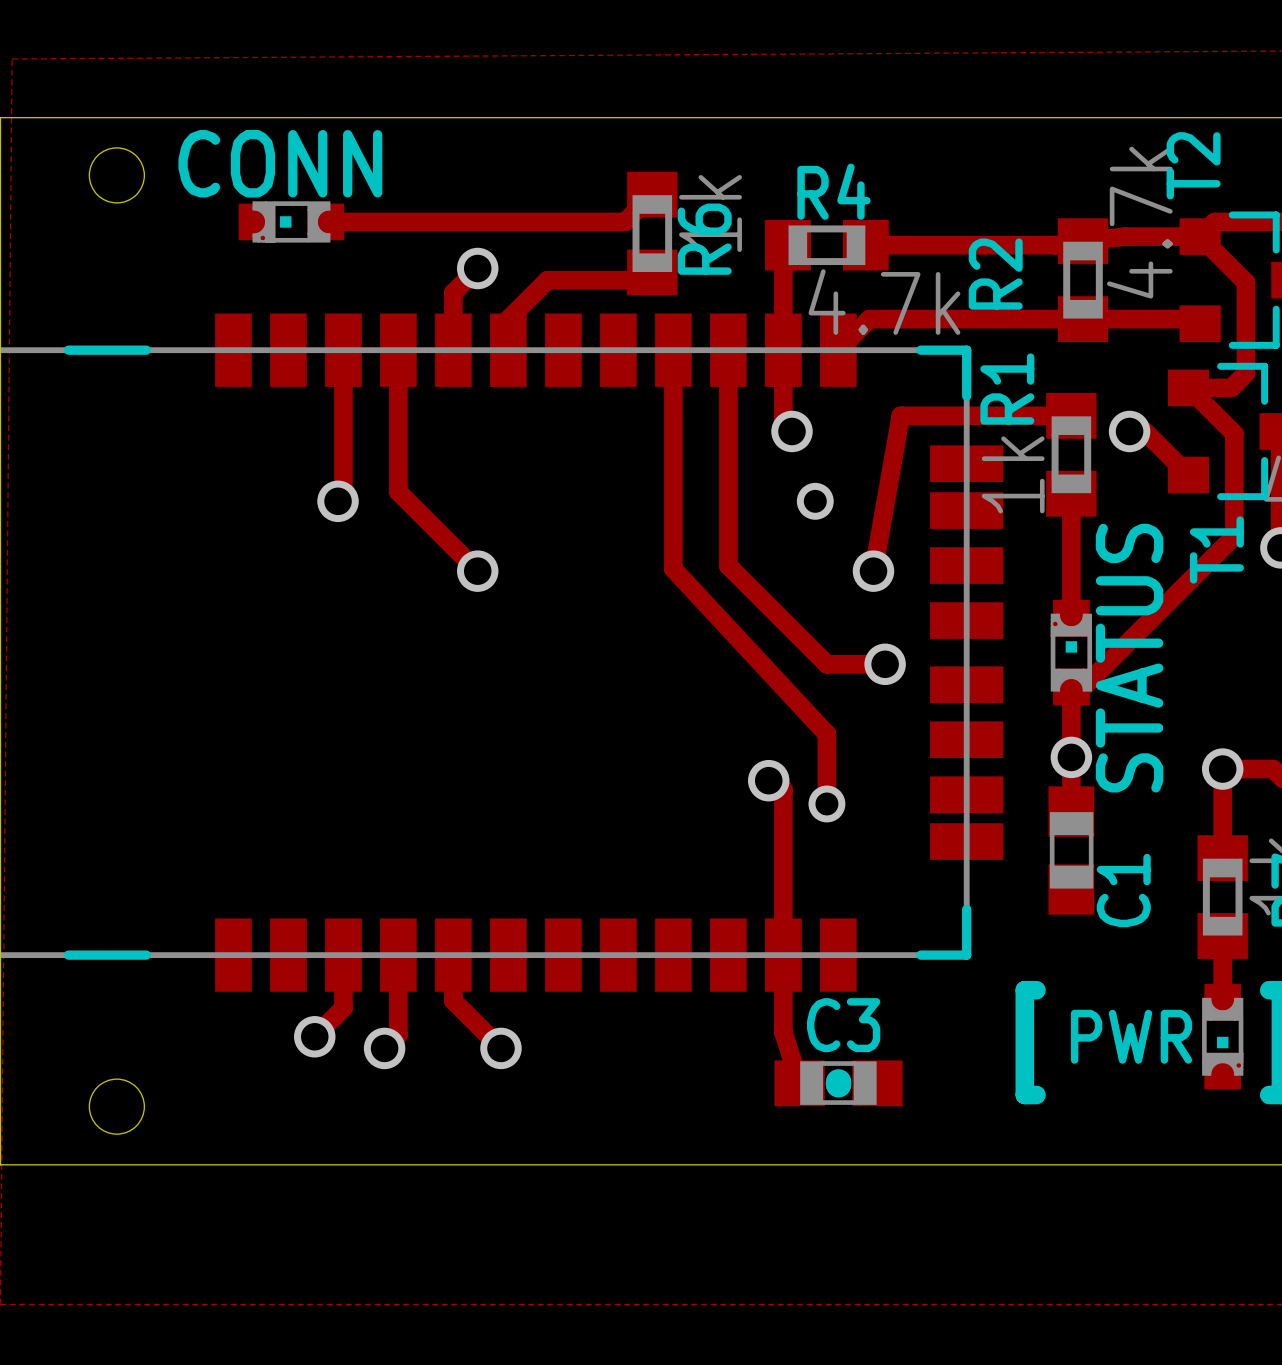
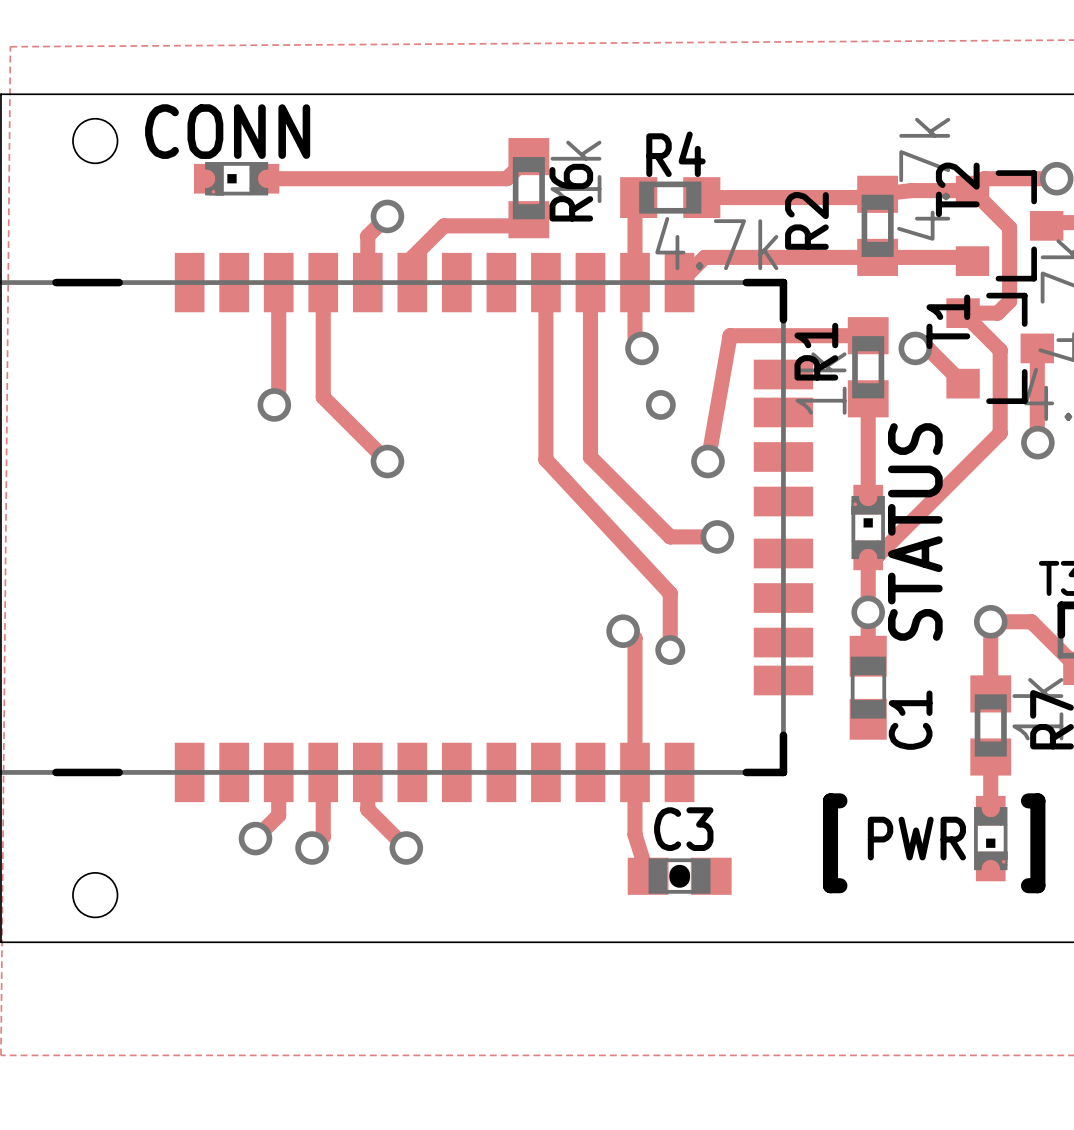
T2 name position: T2 (1193, 165) -> T2 (957, 189)
R1 name position: R1 (1007, 388) -> R1 (816, 351)
T1 name position: T1 (1216, 549) -> T1 (948, 321)

